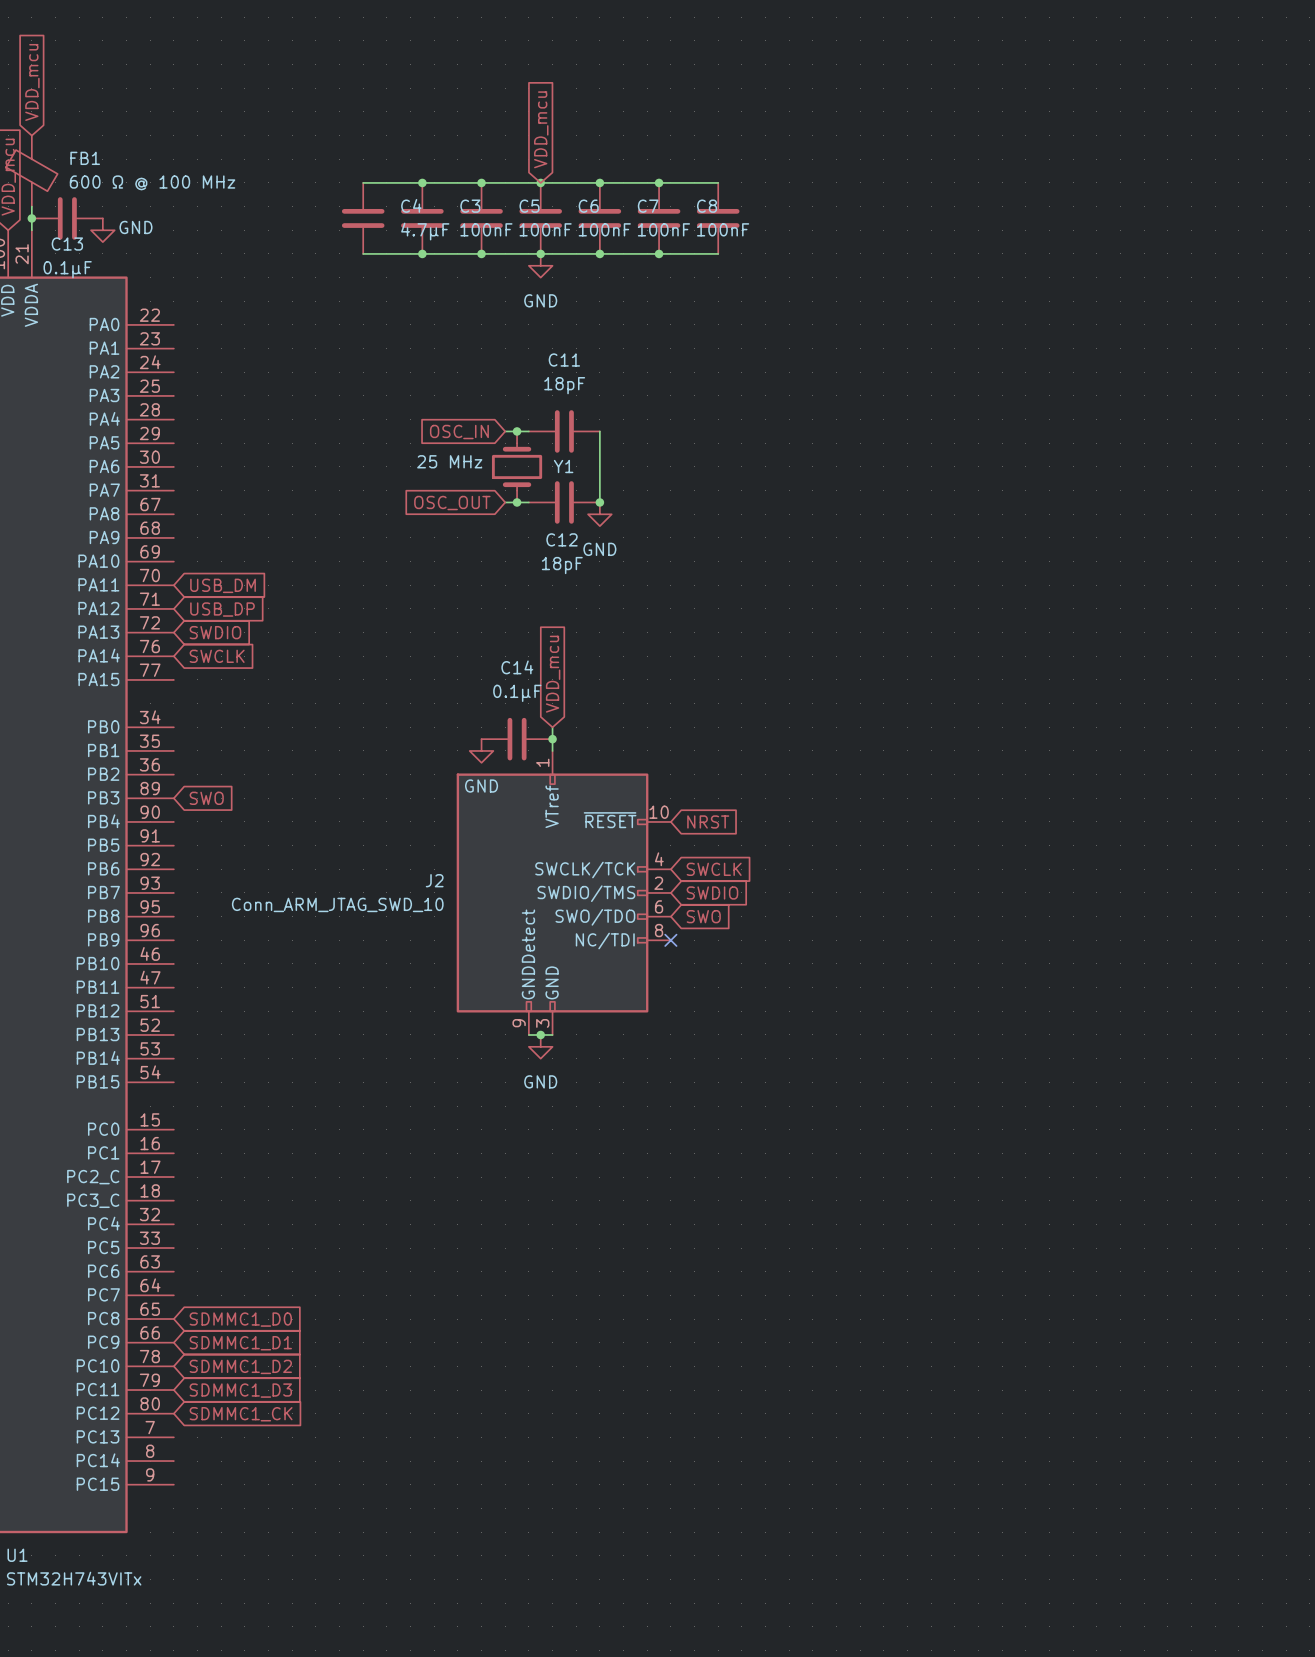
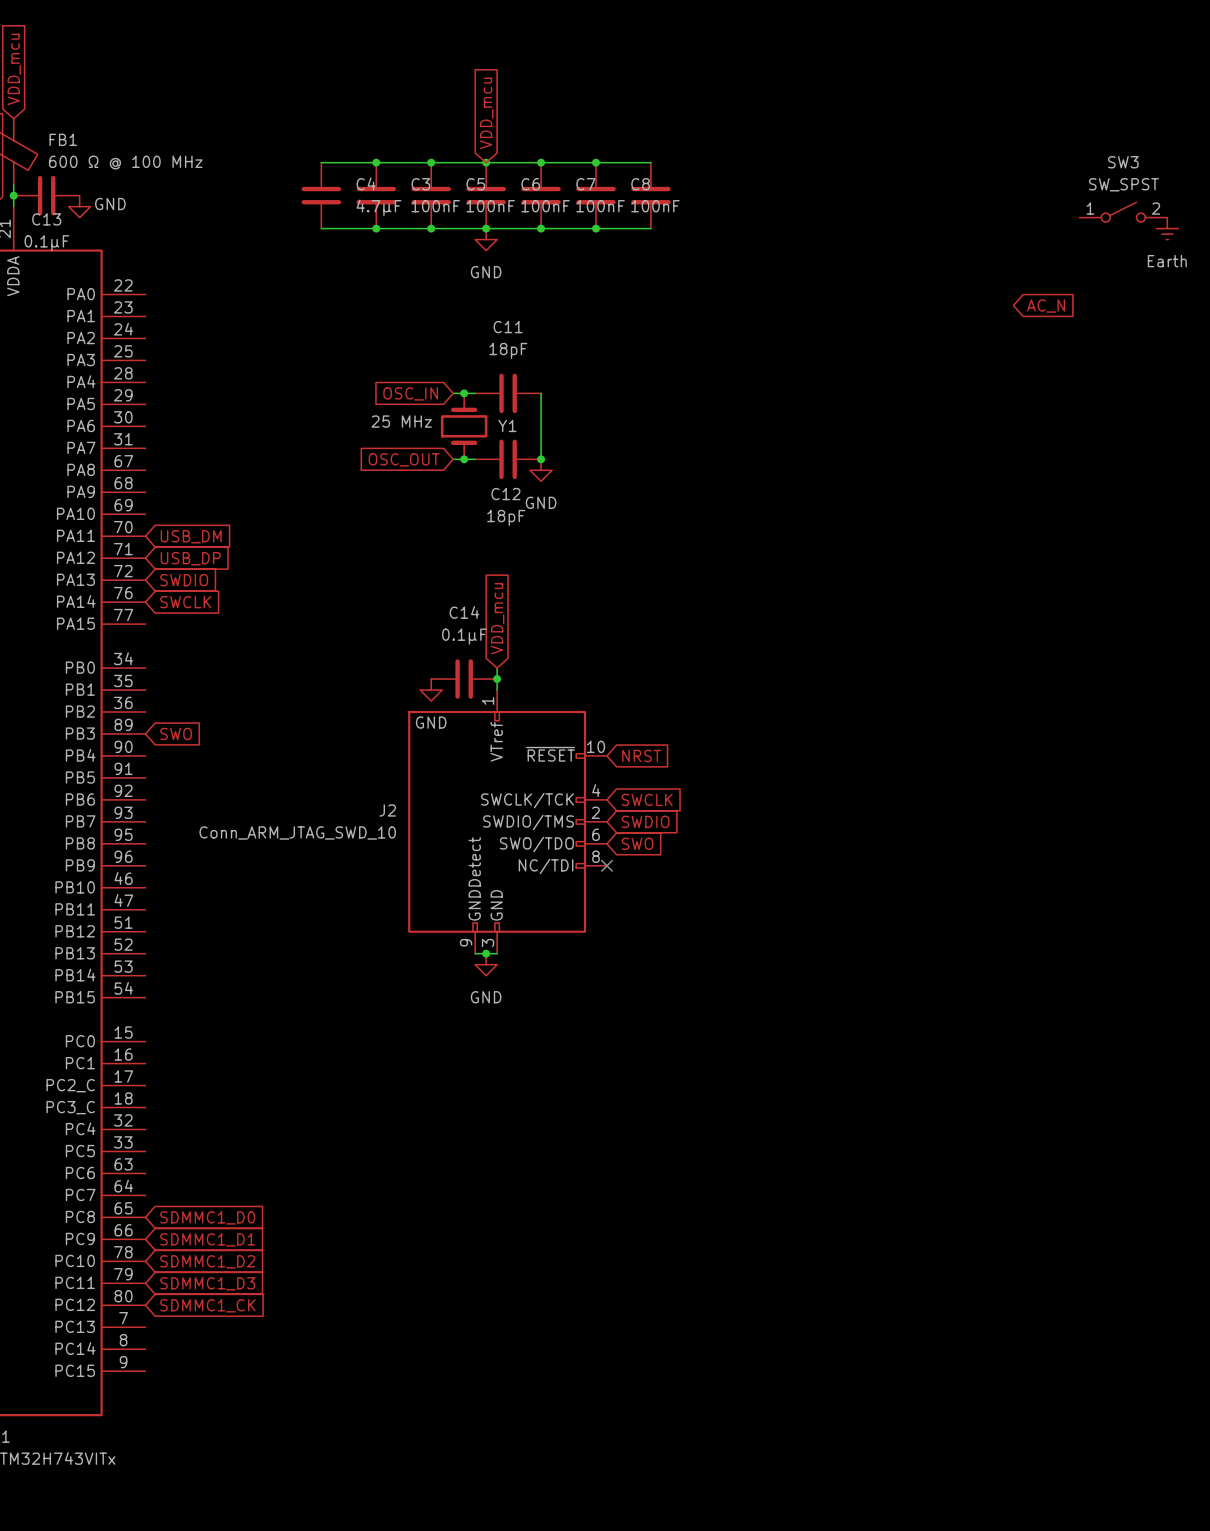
SW3: none -> SW_SPST (1123, 212)
power symbol: none -> Earth (1167, 228)
global label: none -> AC_N (1046, 306)

